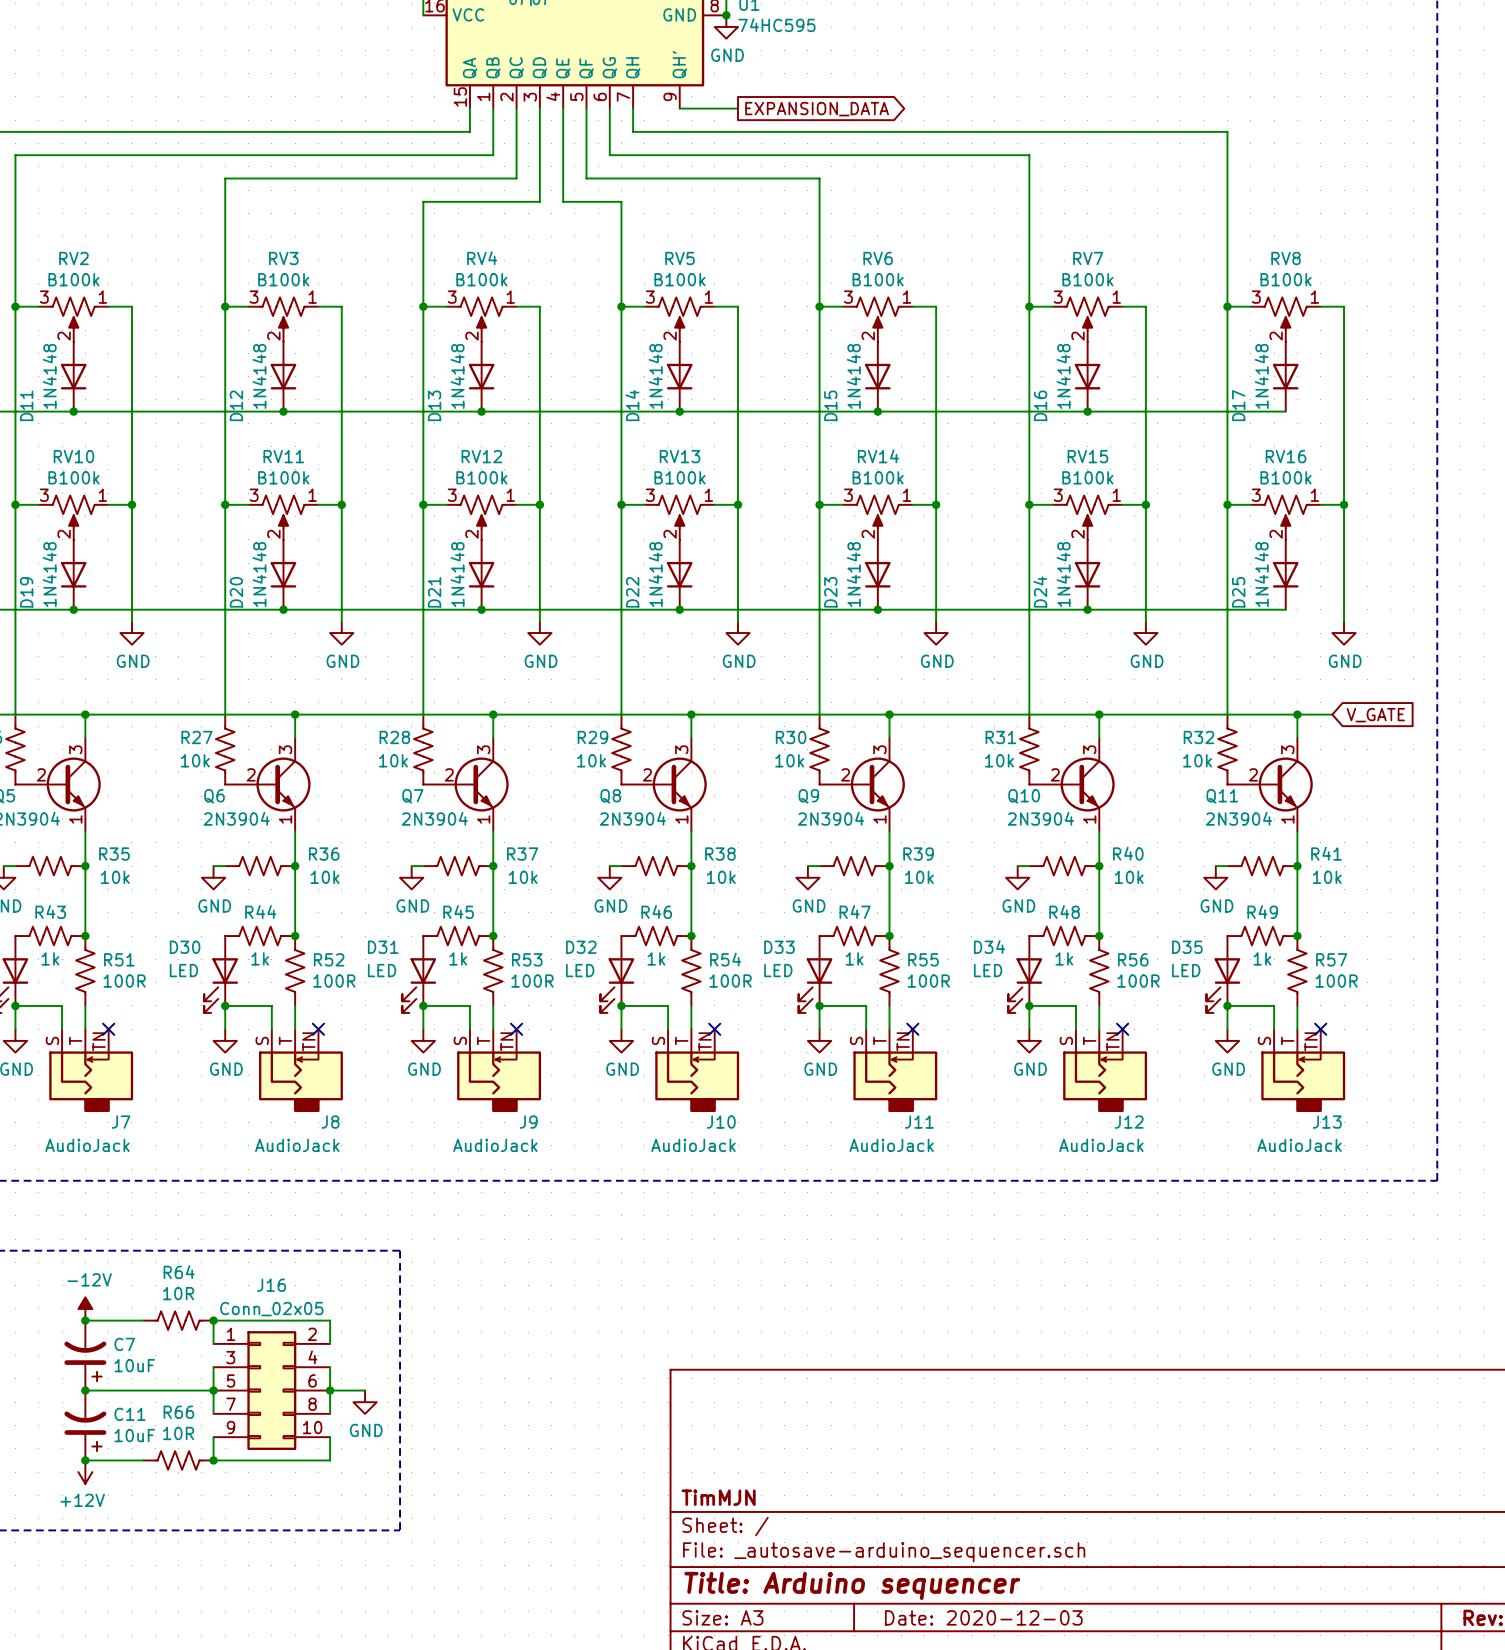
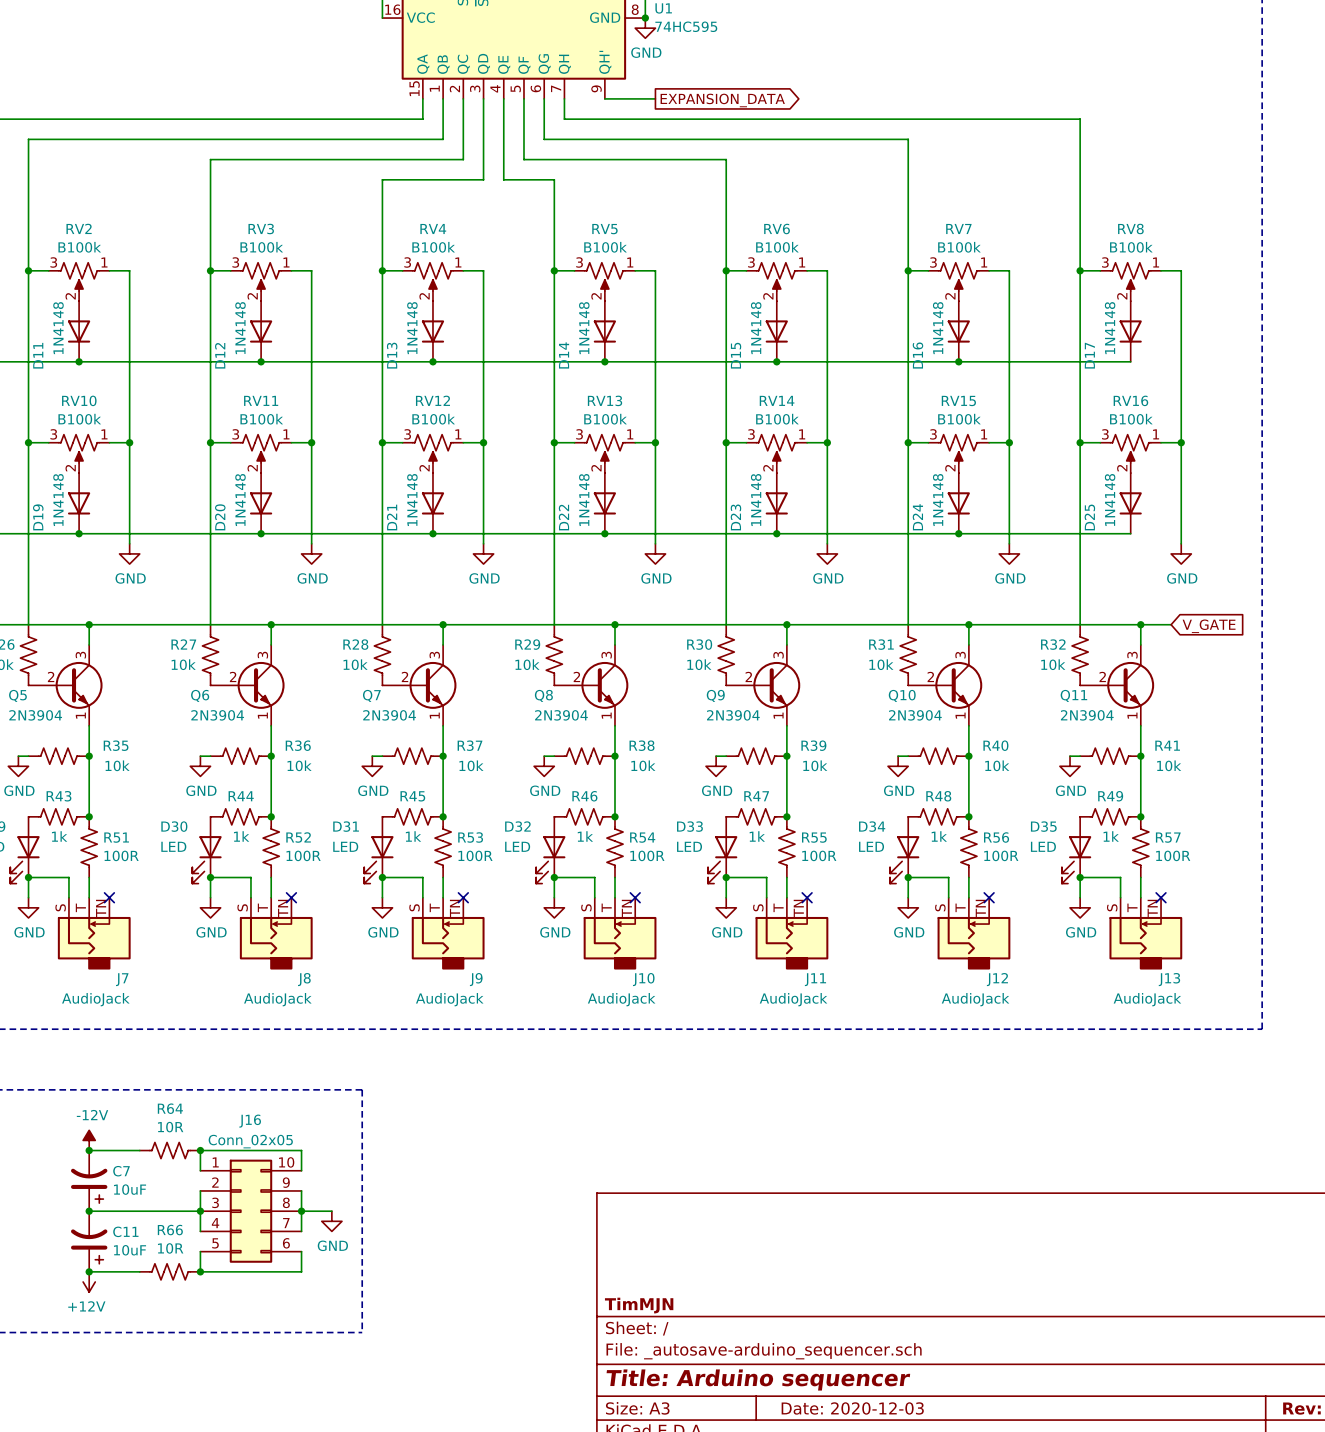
J16 symbol: [213, 1331, 331, 1450] -> [200, 1159, 302, 1263]

